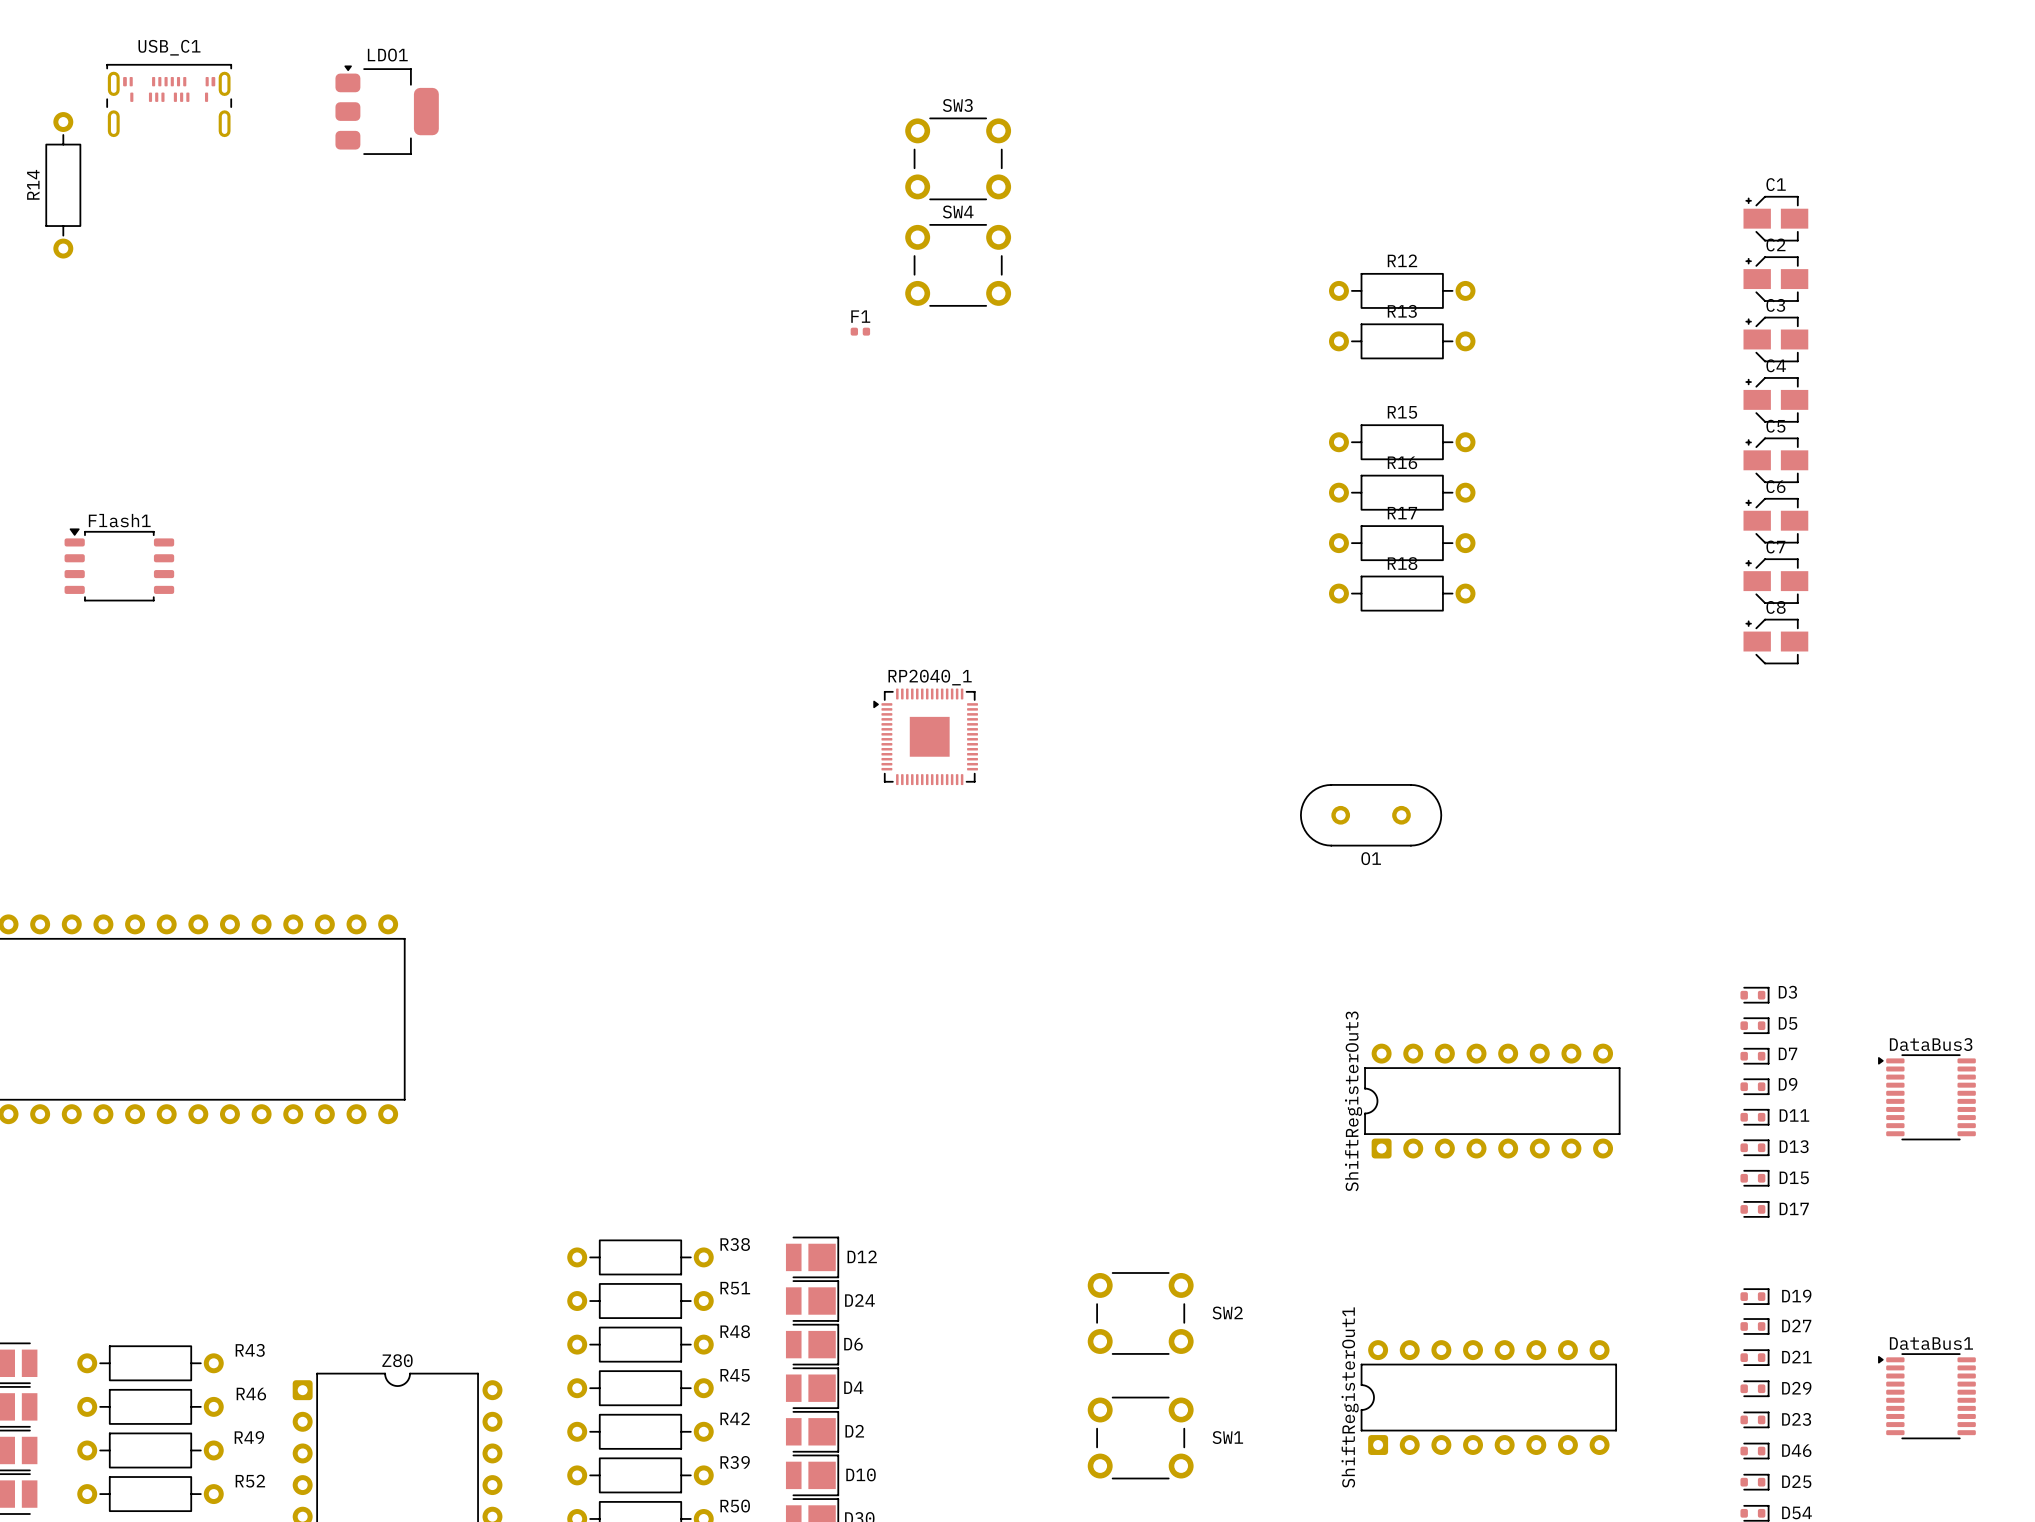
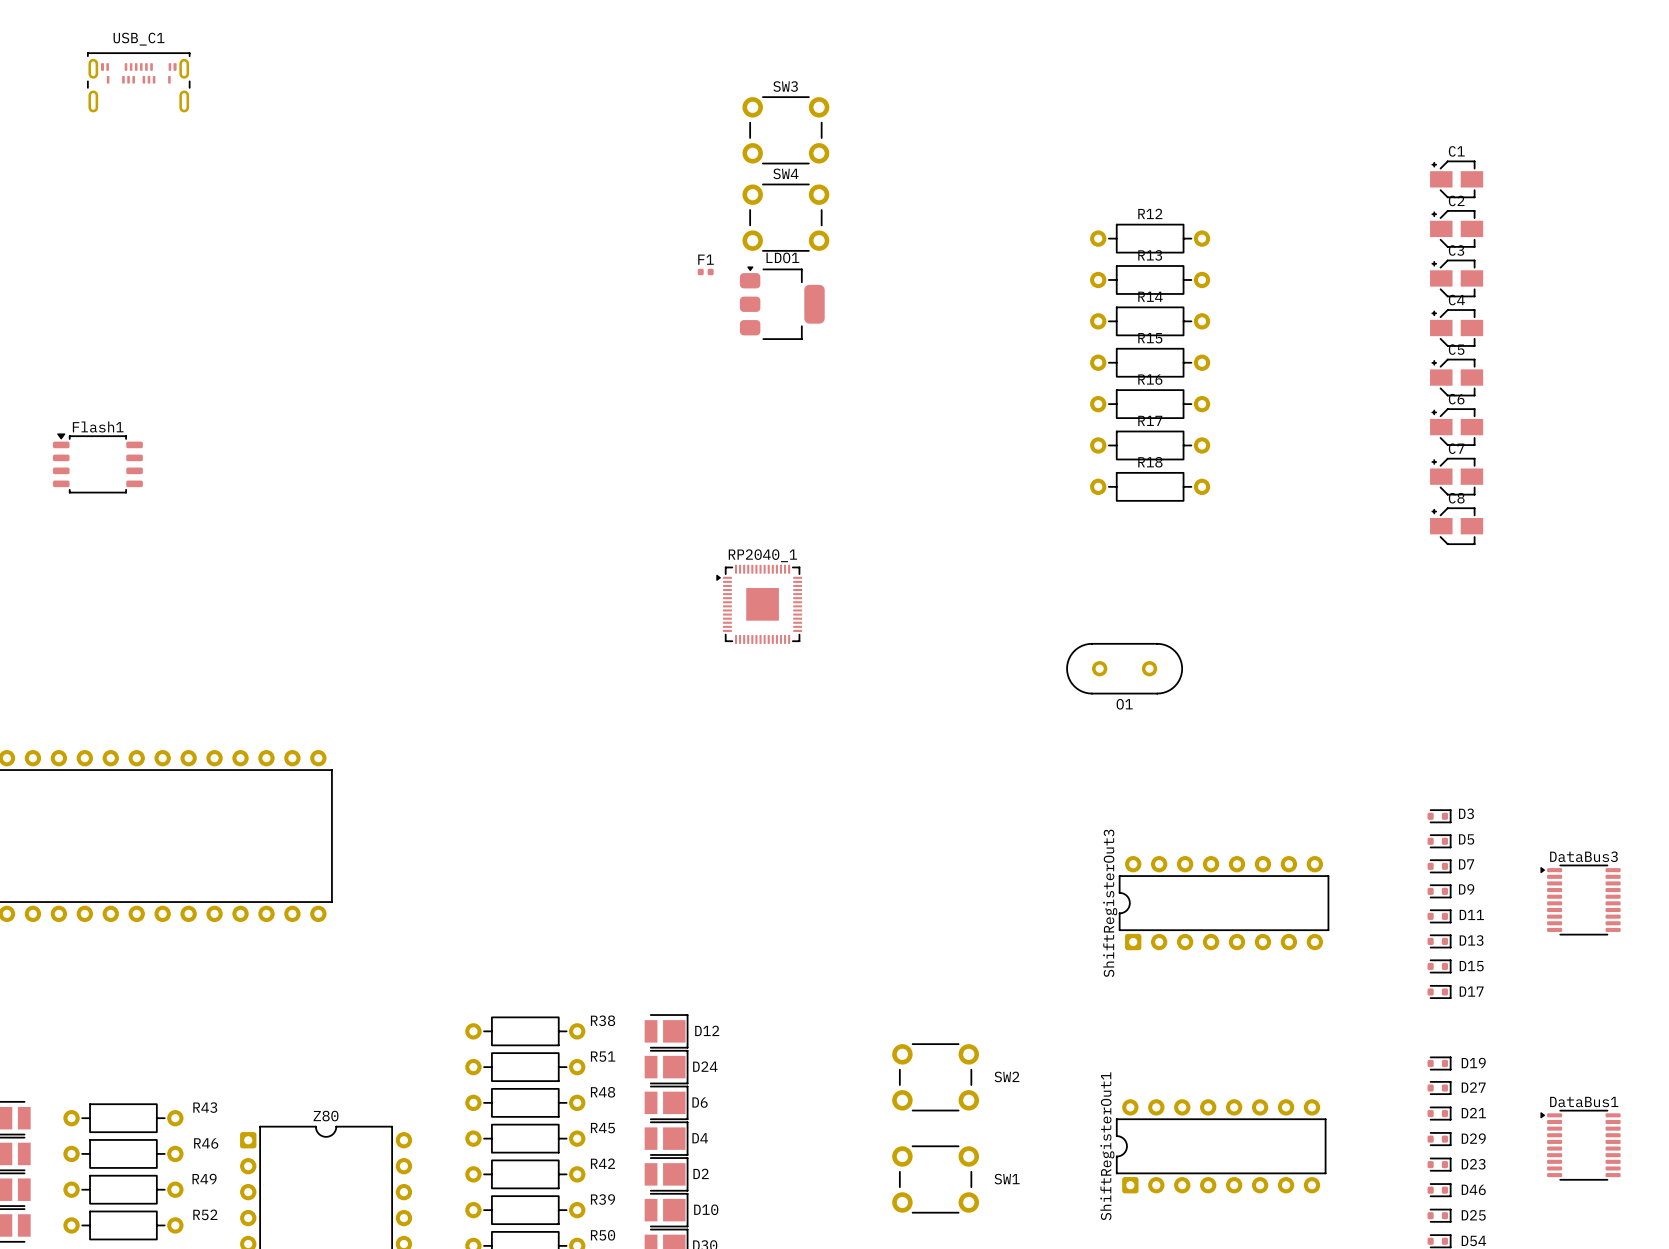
LDO1 position: (387, 110) -> (782, 303)
R14 rotation: 0° (63, 185) -> 90° clockwise (1150, 321)
R14 position: (63, 185) -> (1150, 321)

